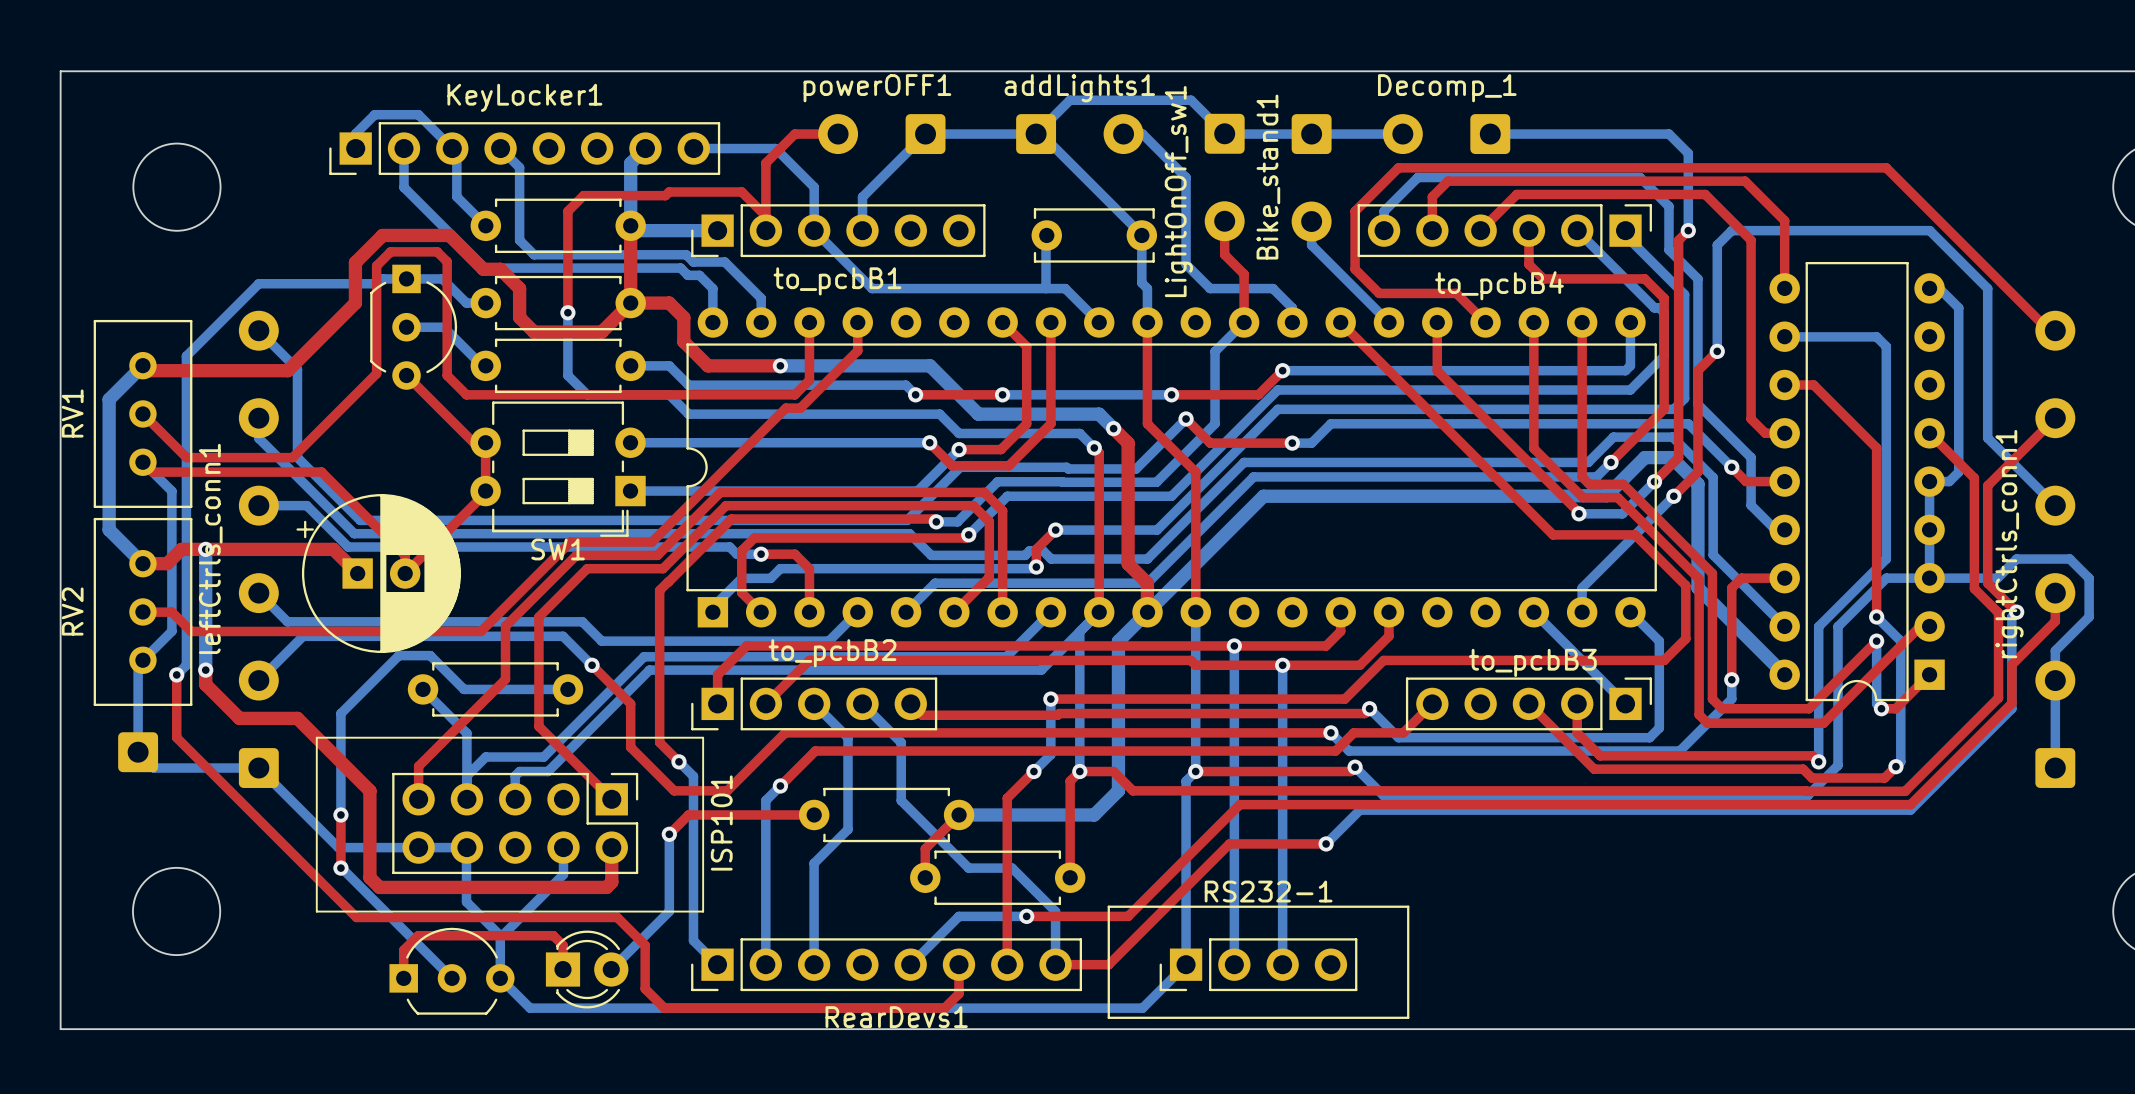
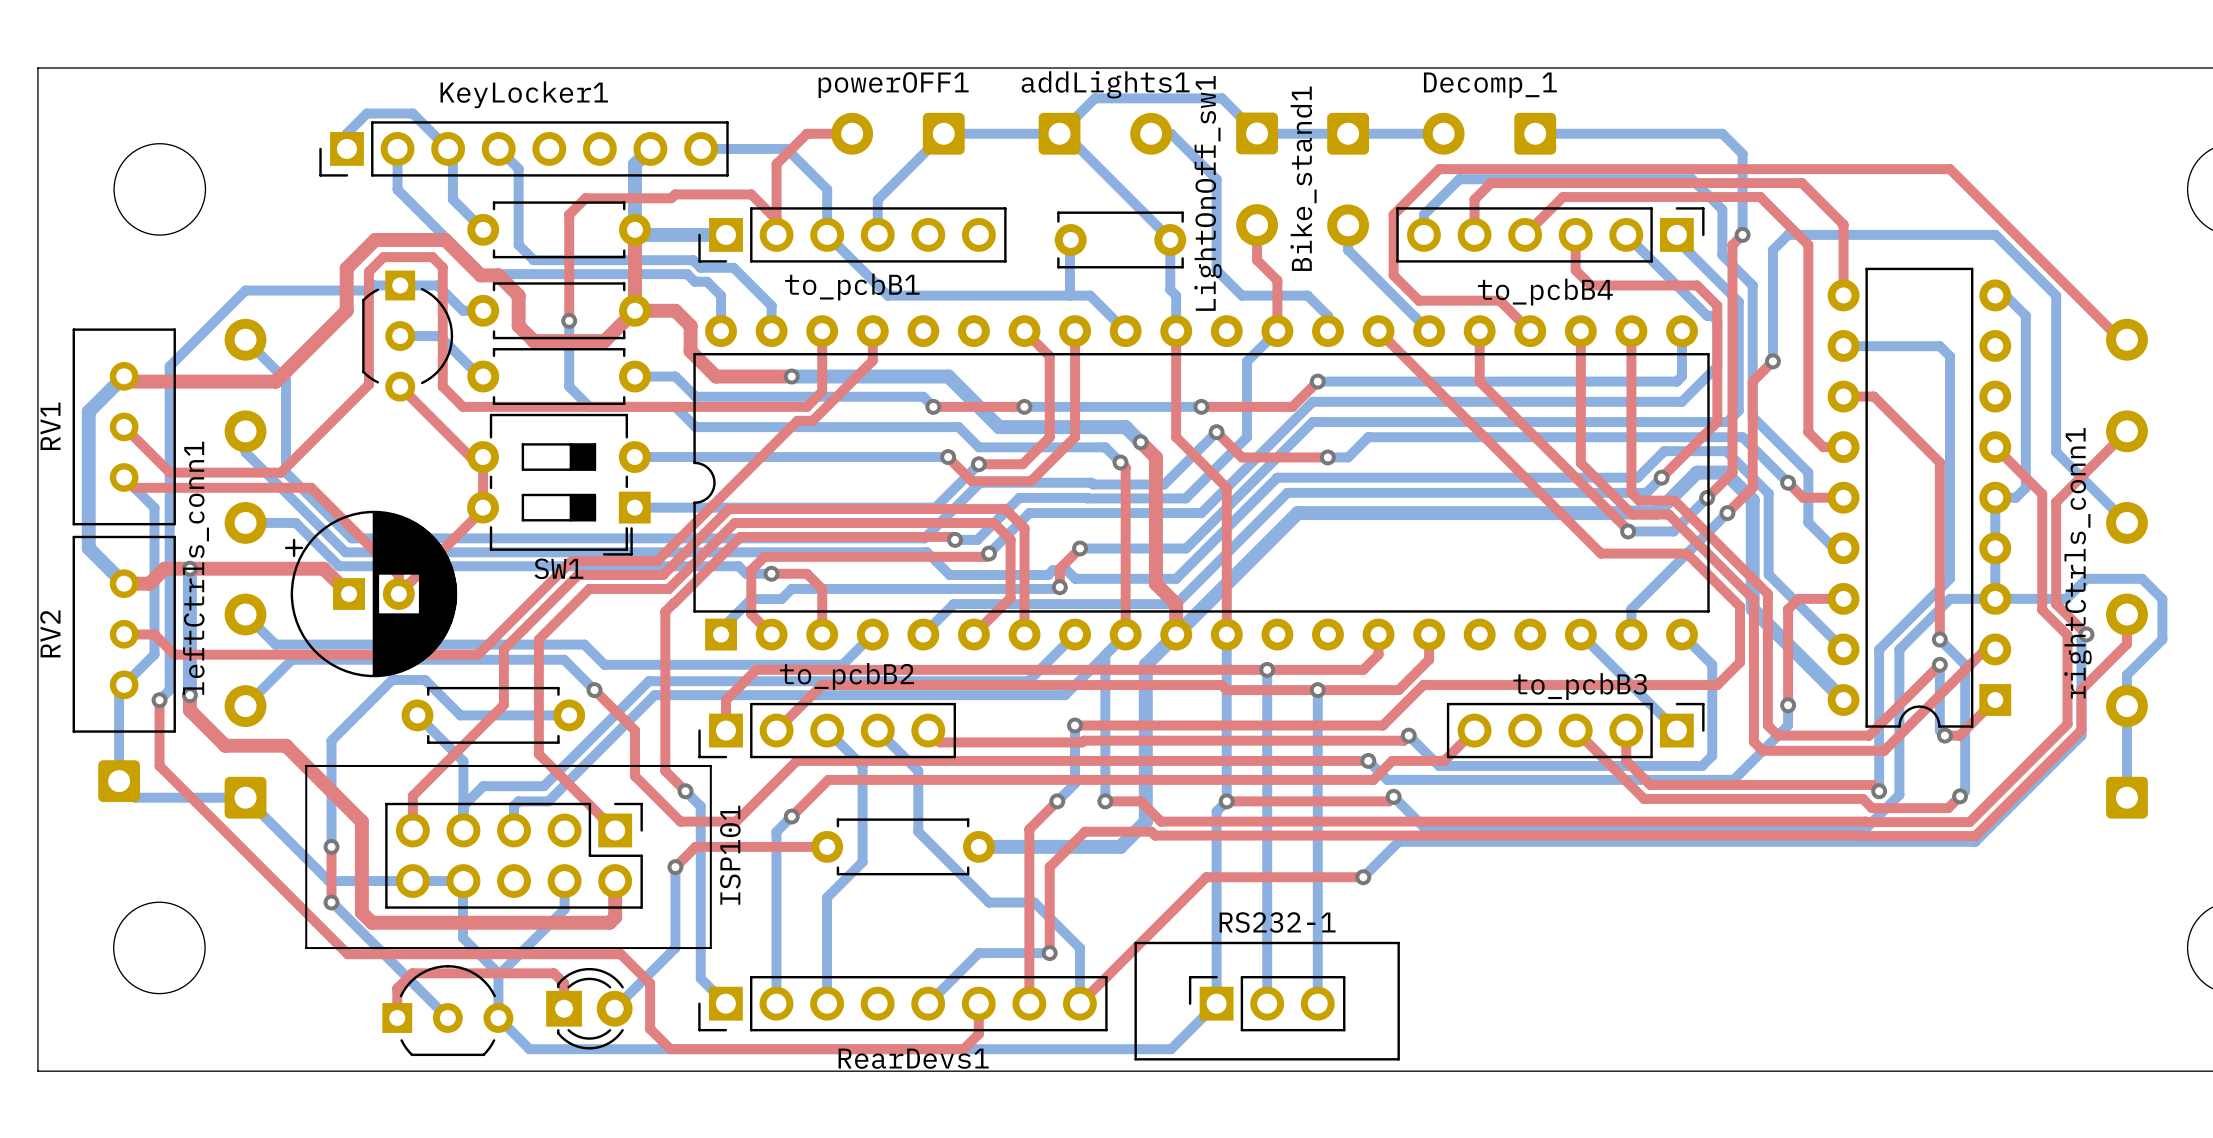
top track: (1079, 771) (1070, 781) (1070, 877) -> none
top track: (1800, 804) (1239, 804) (1128, 916) (1026, 916) -> (1860, 836) (1155, 835) (1151, 831) (1085, 831) (1049, 867) (1049, 953)
top track: (959, 814) (925, 848) (925, 877) -> none
top track: (1229, 843) (1108, 964) (1055, 964) -> (1262, 877) (1206, 877) (1079, 1003)
part: (997, 877) -> none
line: (1359, 906) (1408, 906) (1408, 1017) (1359, 1017) -> (1398, 942) (1398, 1059)
RS232-1 footprint: [1159, 938, 1358, 992] -> [1188, 976, 1346, 1032]

